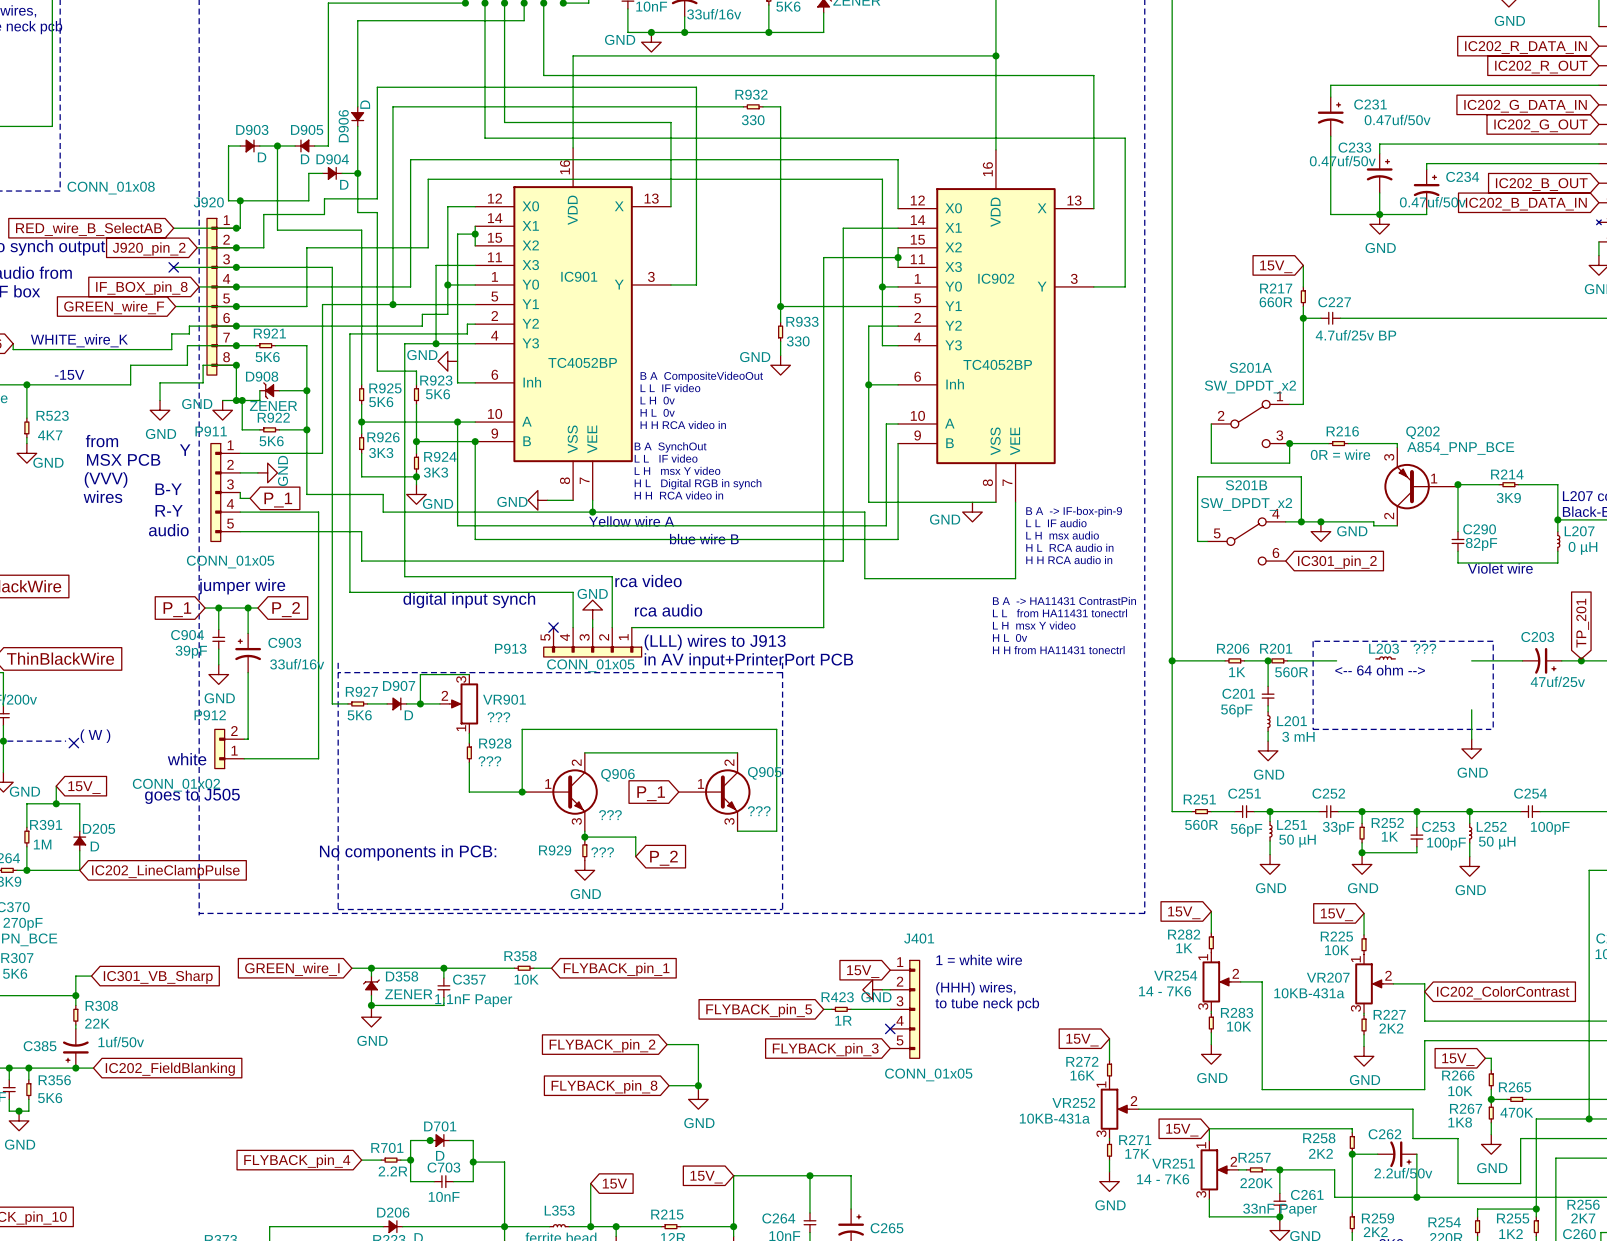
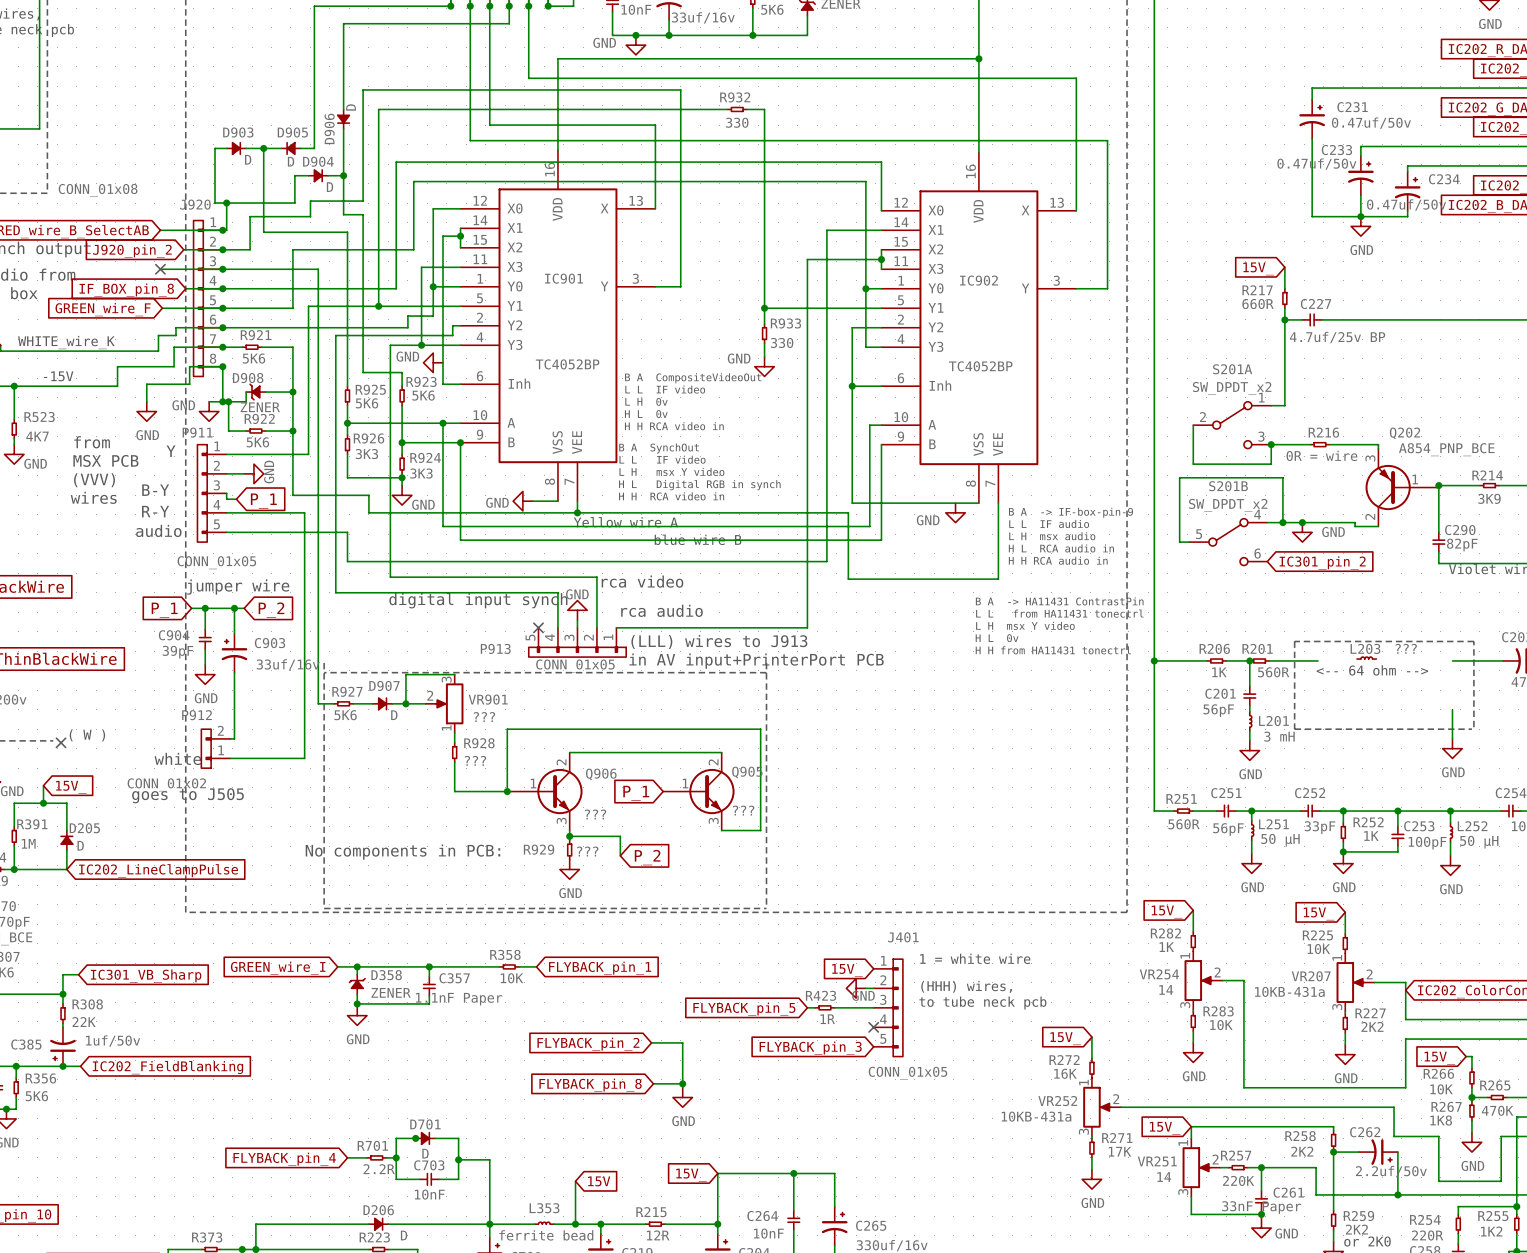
VR254 value: 14 - 7K6 (1165, 991) -> 14 (1166, 989)
VR251 value: 14 - 7K6 (1163, 1179) -> 14 (1164, 1177)

